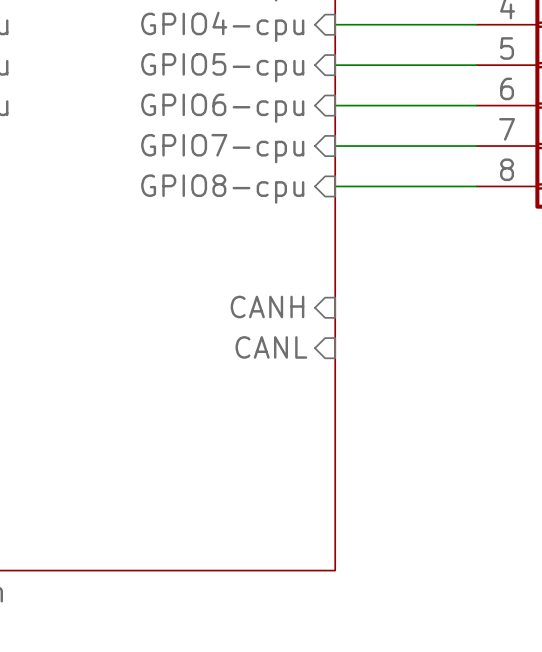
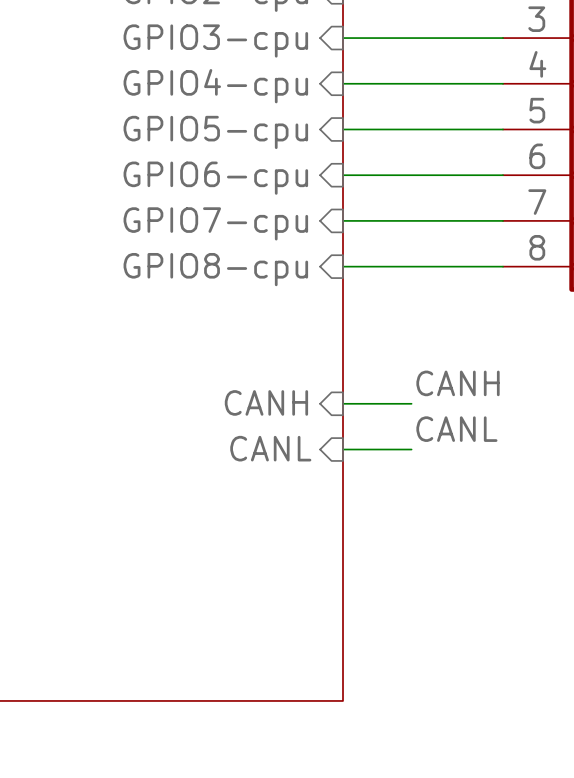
label: none -> CANH (458, 383)
wire: none -> (343, 403) (411, 403)
label: none -> CANL (456, 429)
wire: none -> (343, 449) (411, 449)

